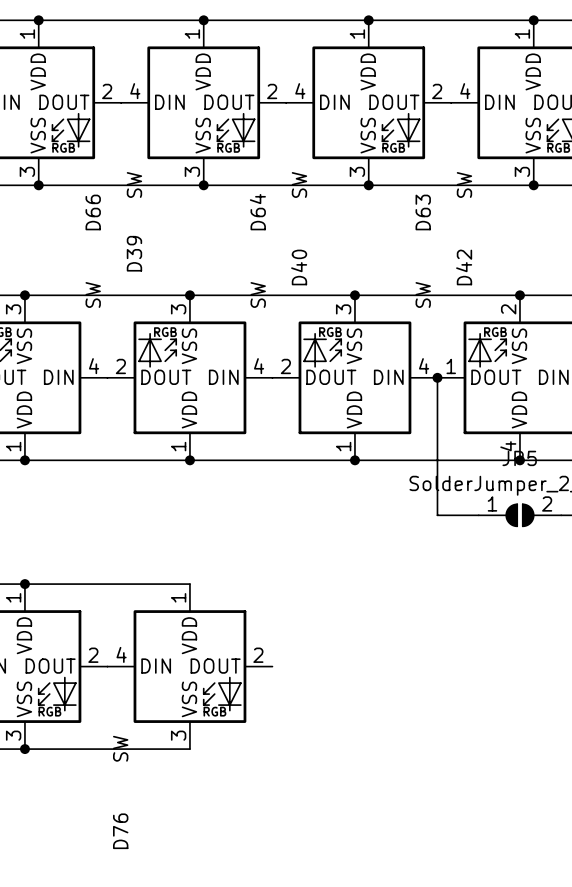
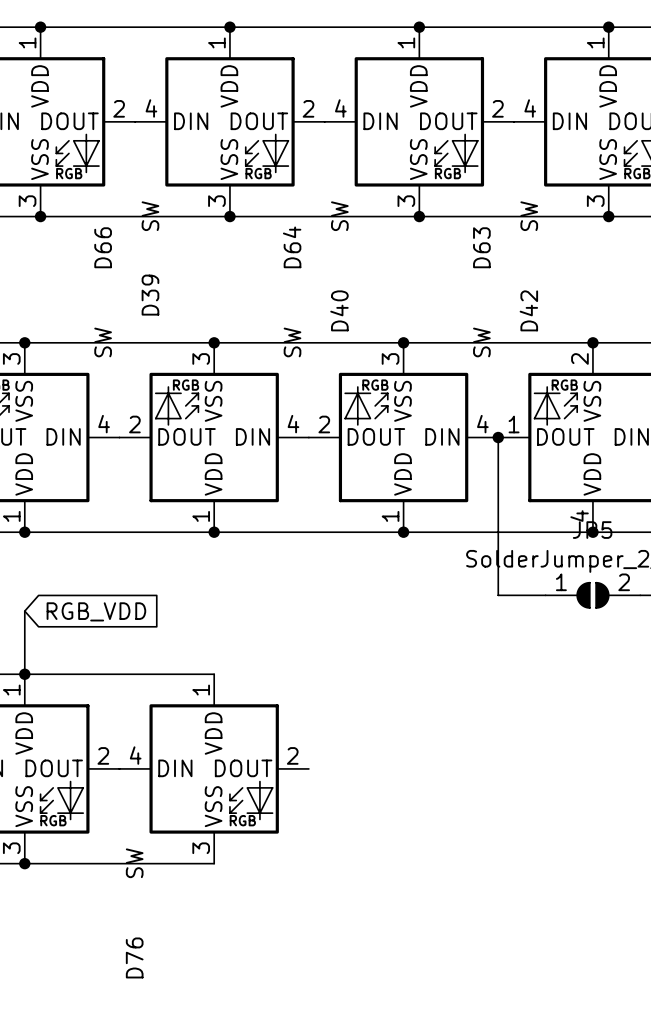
wire: none -> (24, 611) (24, 674)
global label: none -> RGB_VDD (96, 611)

